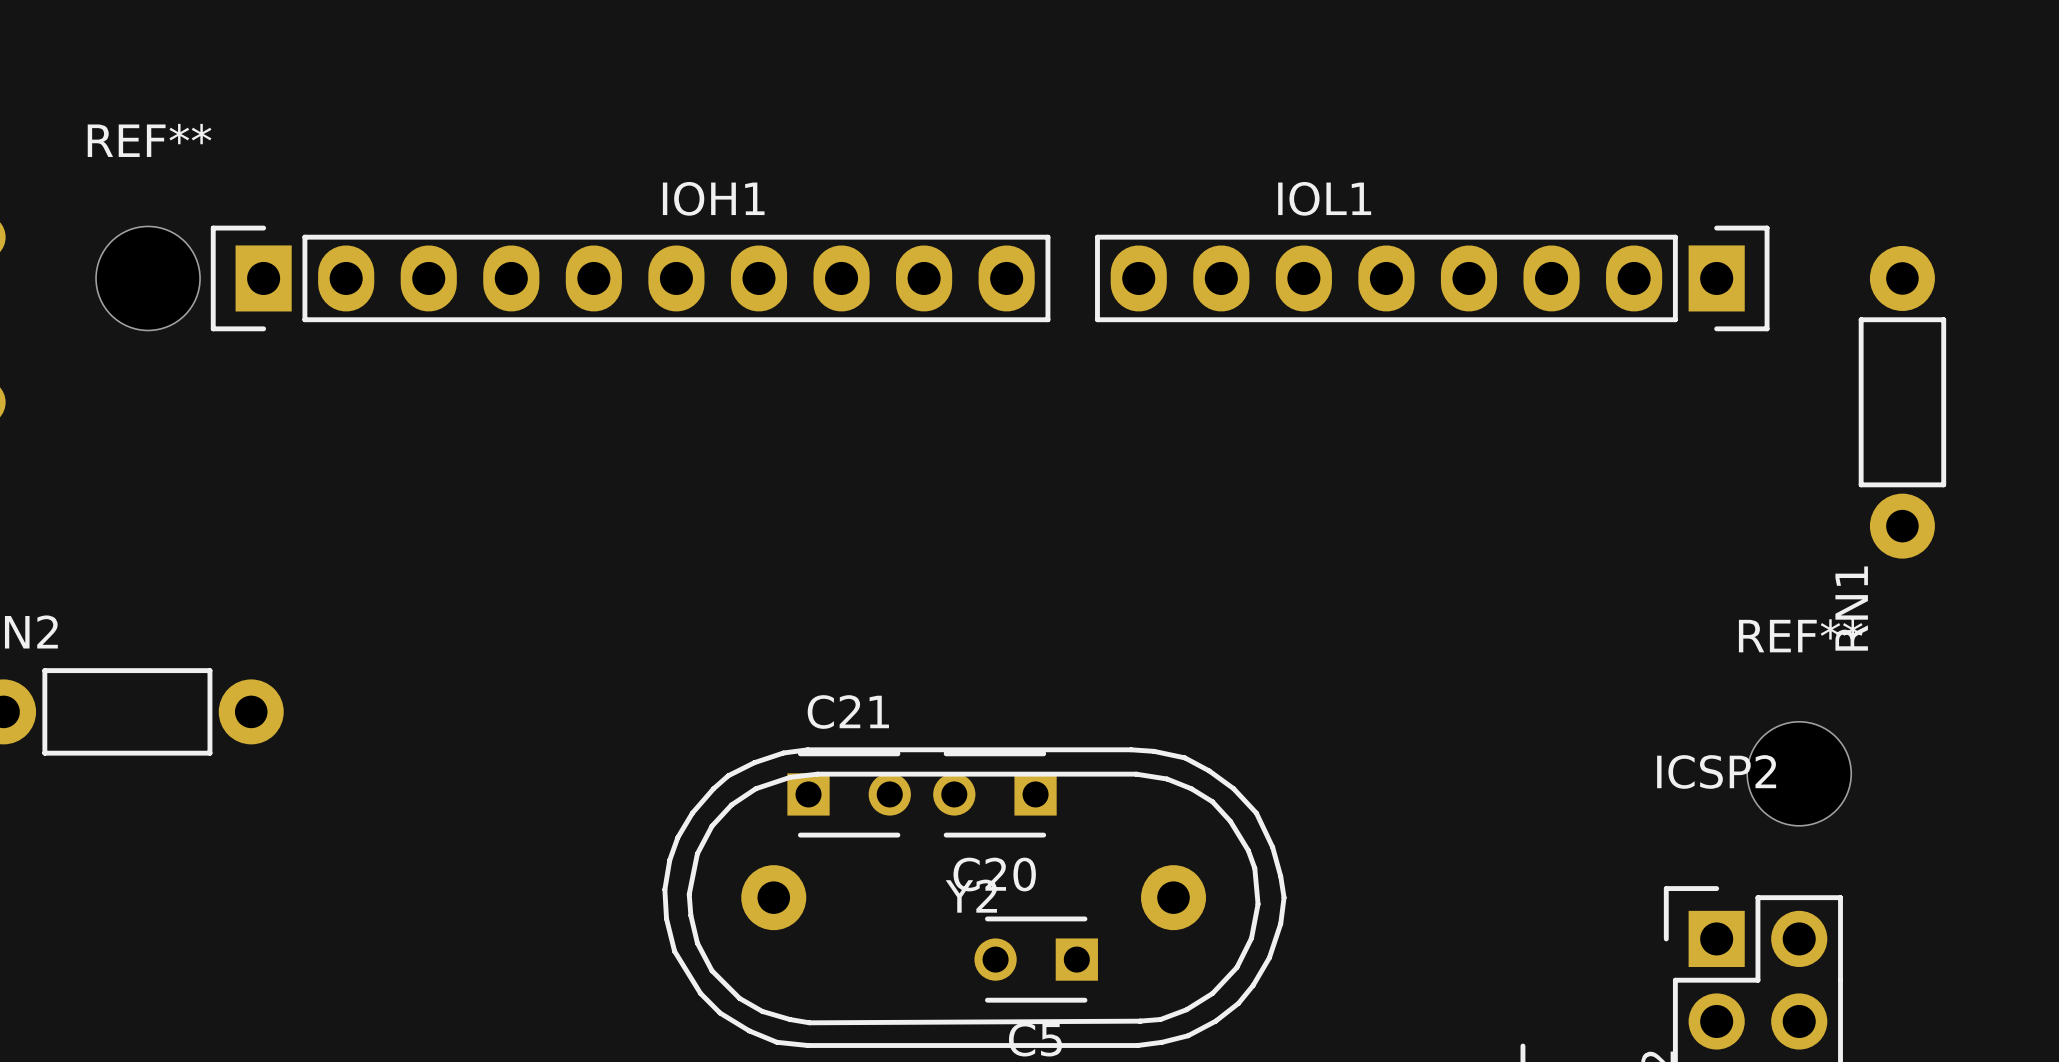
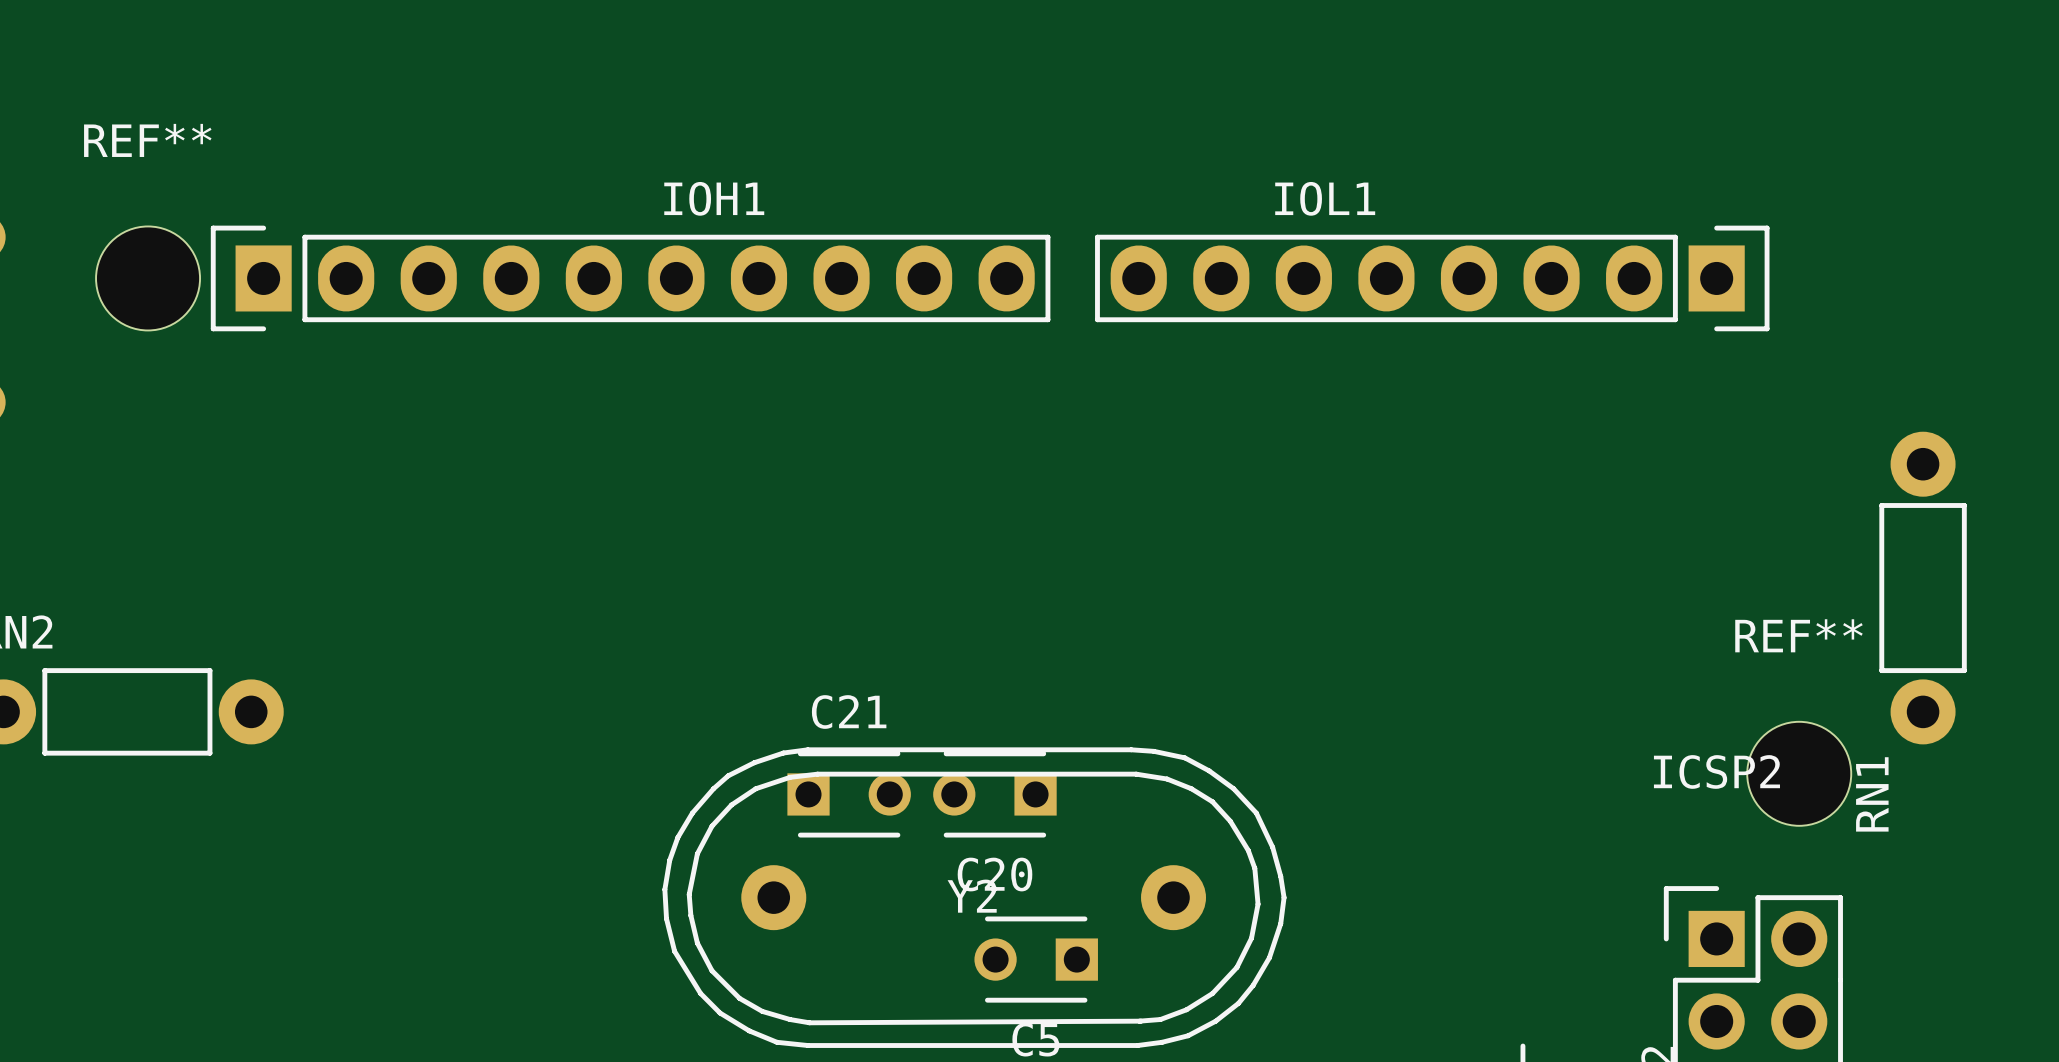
RN1 position: (1902, 402) -> (1923, 588)

